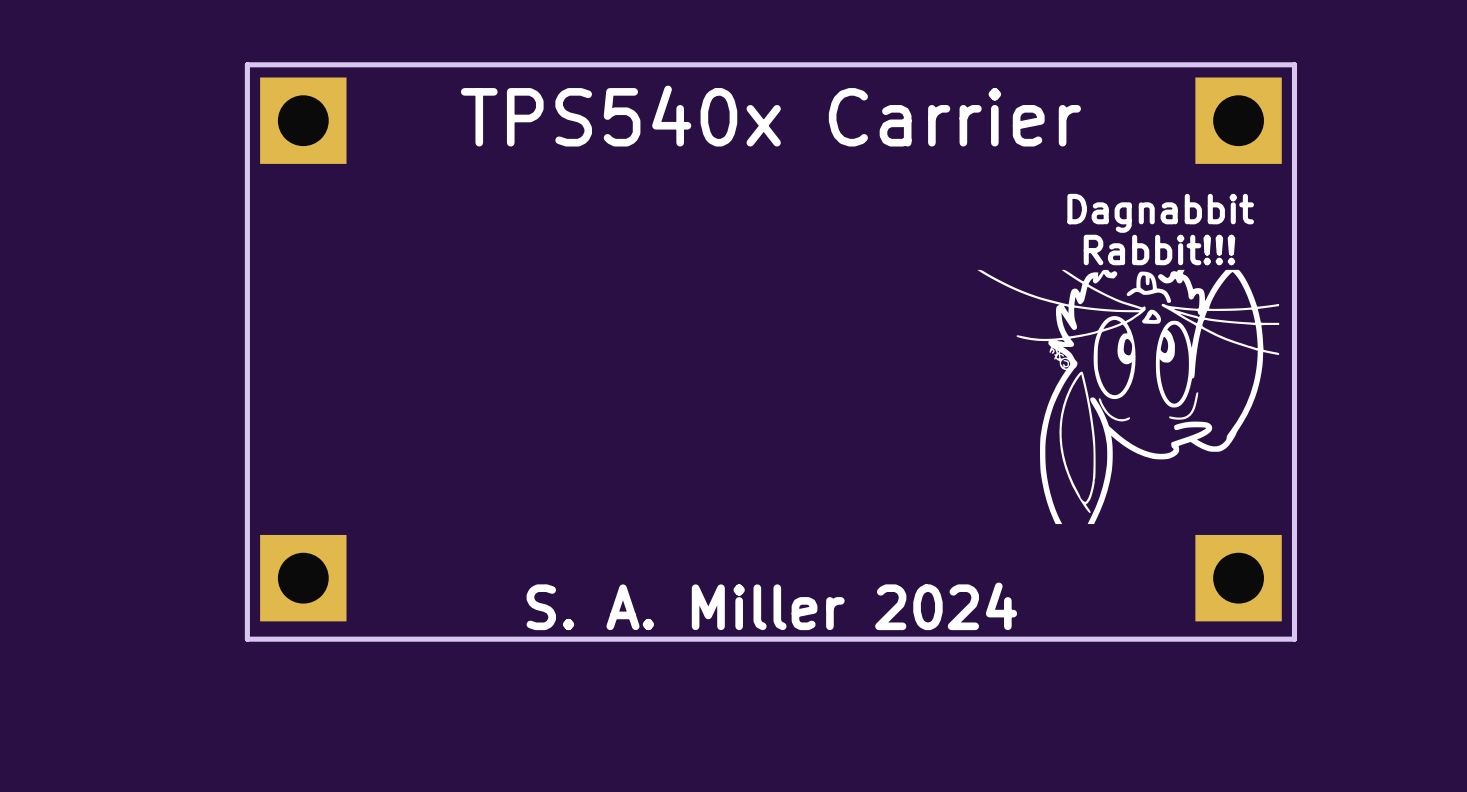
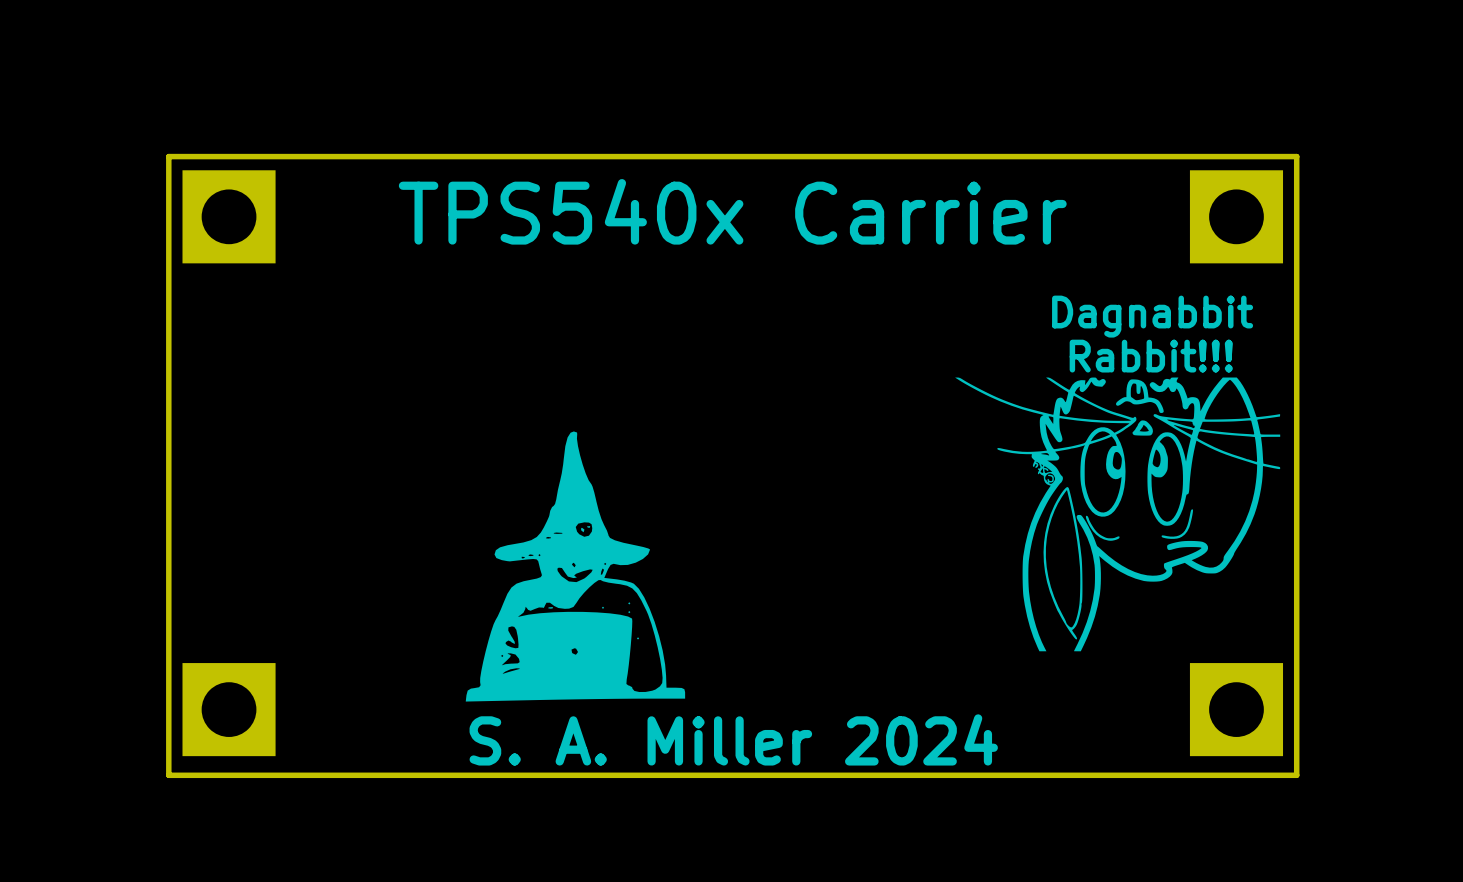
drawing: none -> [465, 431, 686, 702]

